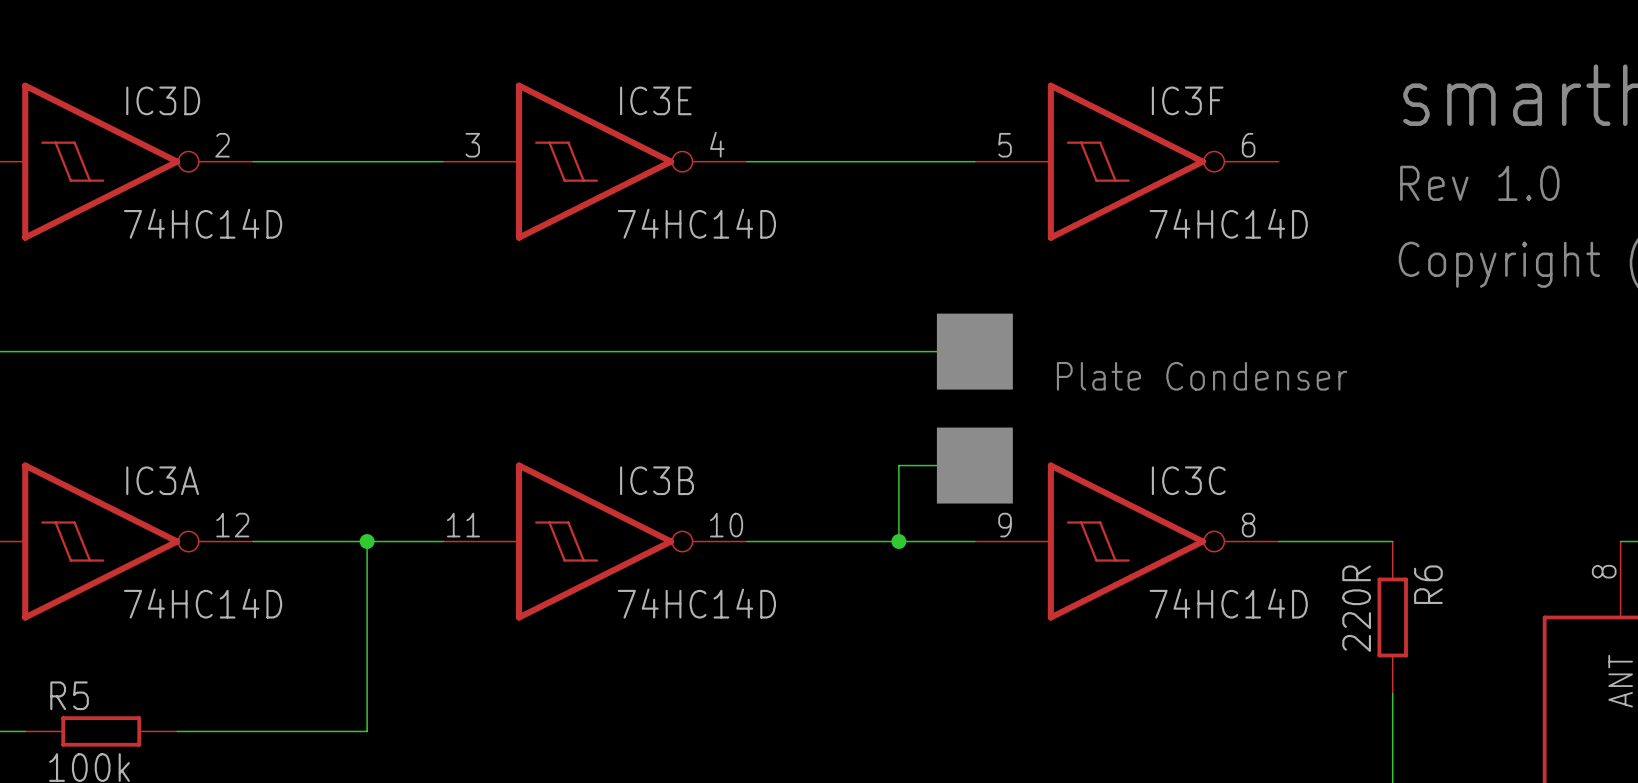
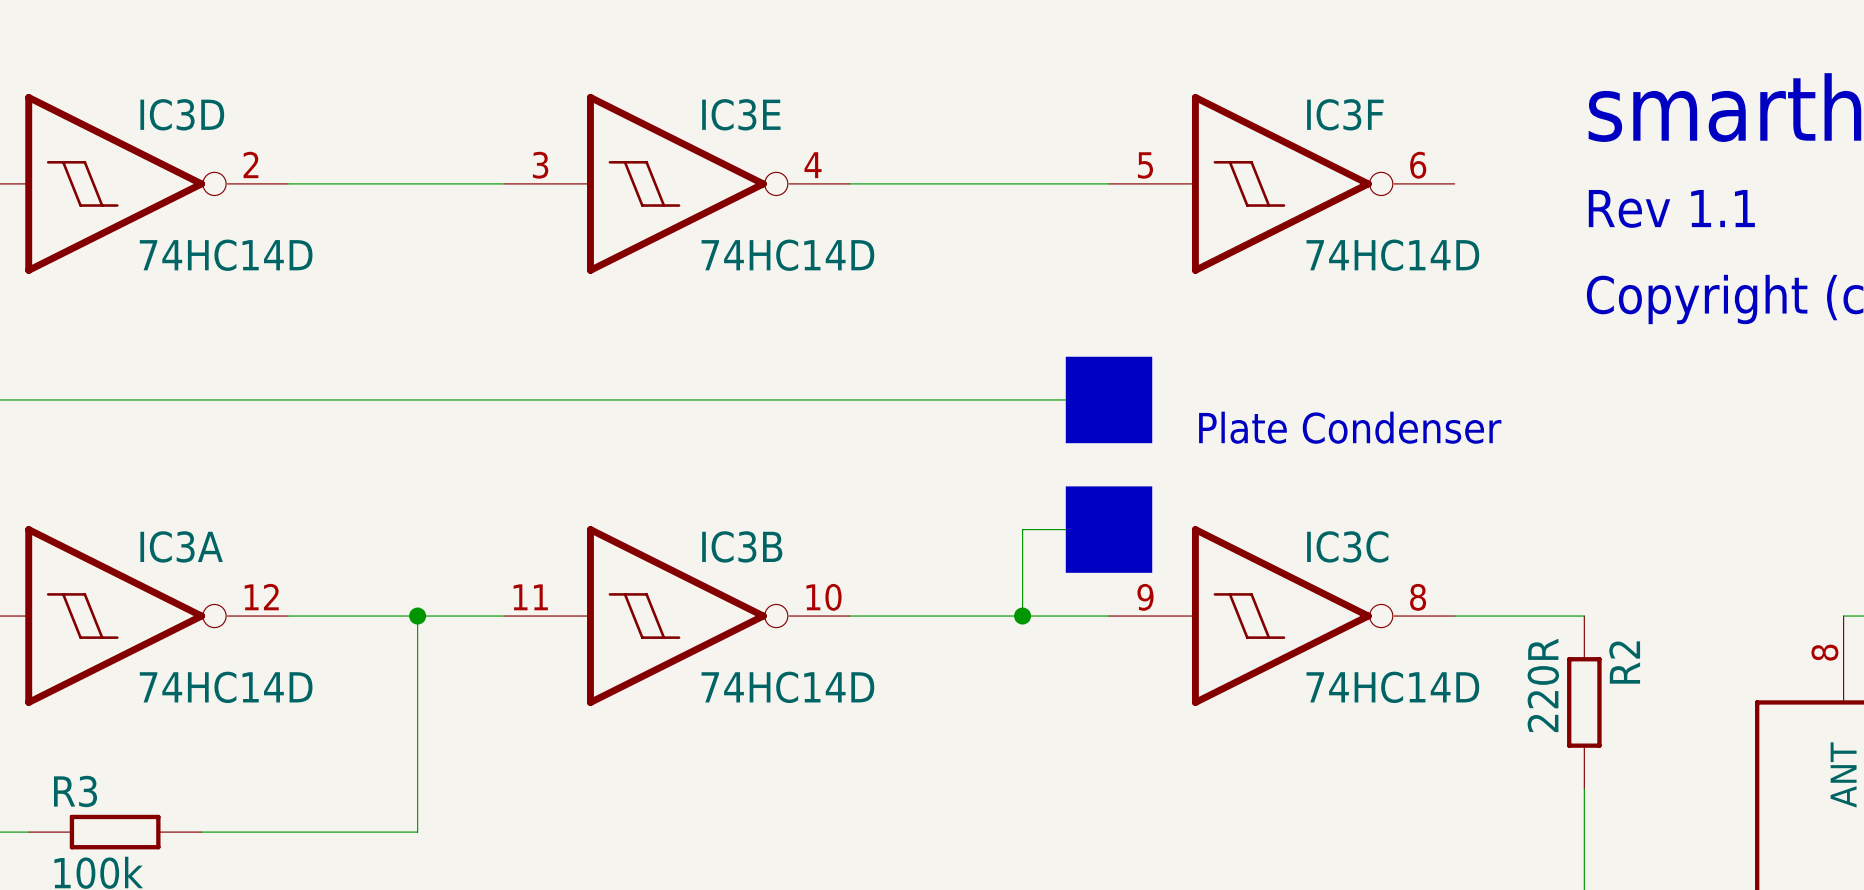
text: Rev 1.0 (1479, 183) -> Rev 1.1 (1671, 208)
R6 name: R6 (1428, 584) -> R2 (1624, 662)
R5 name: R5 (69, 695) -> R3 (75, 791)

